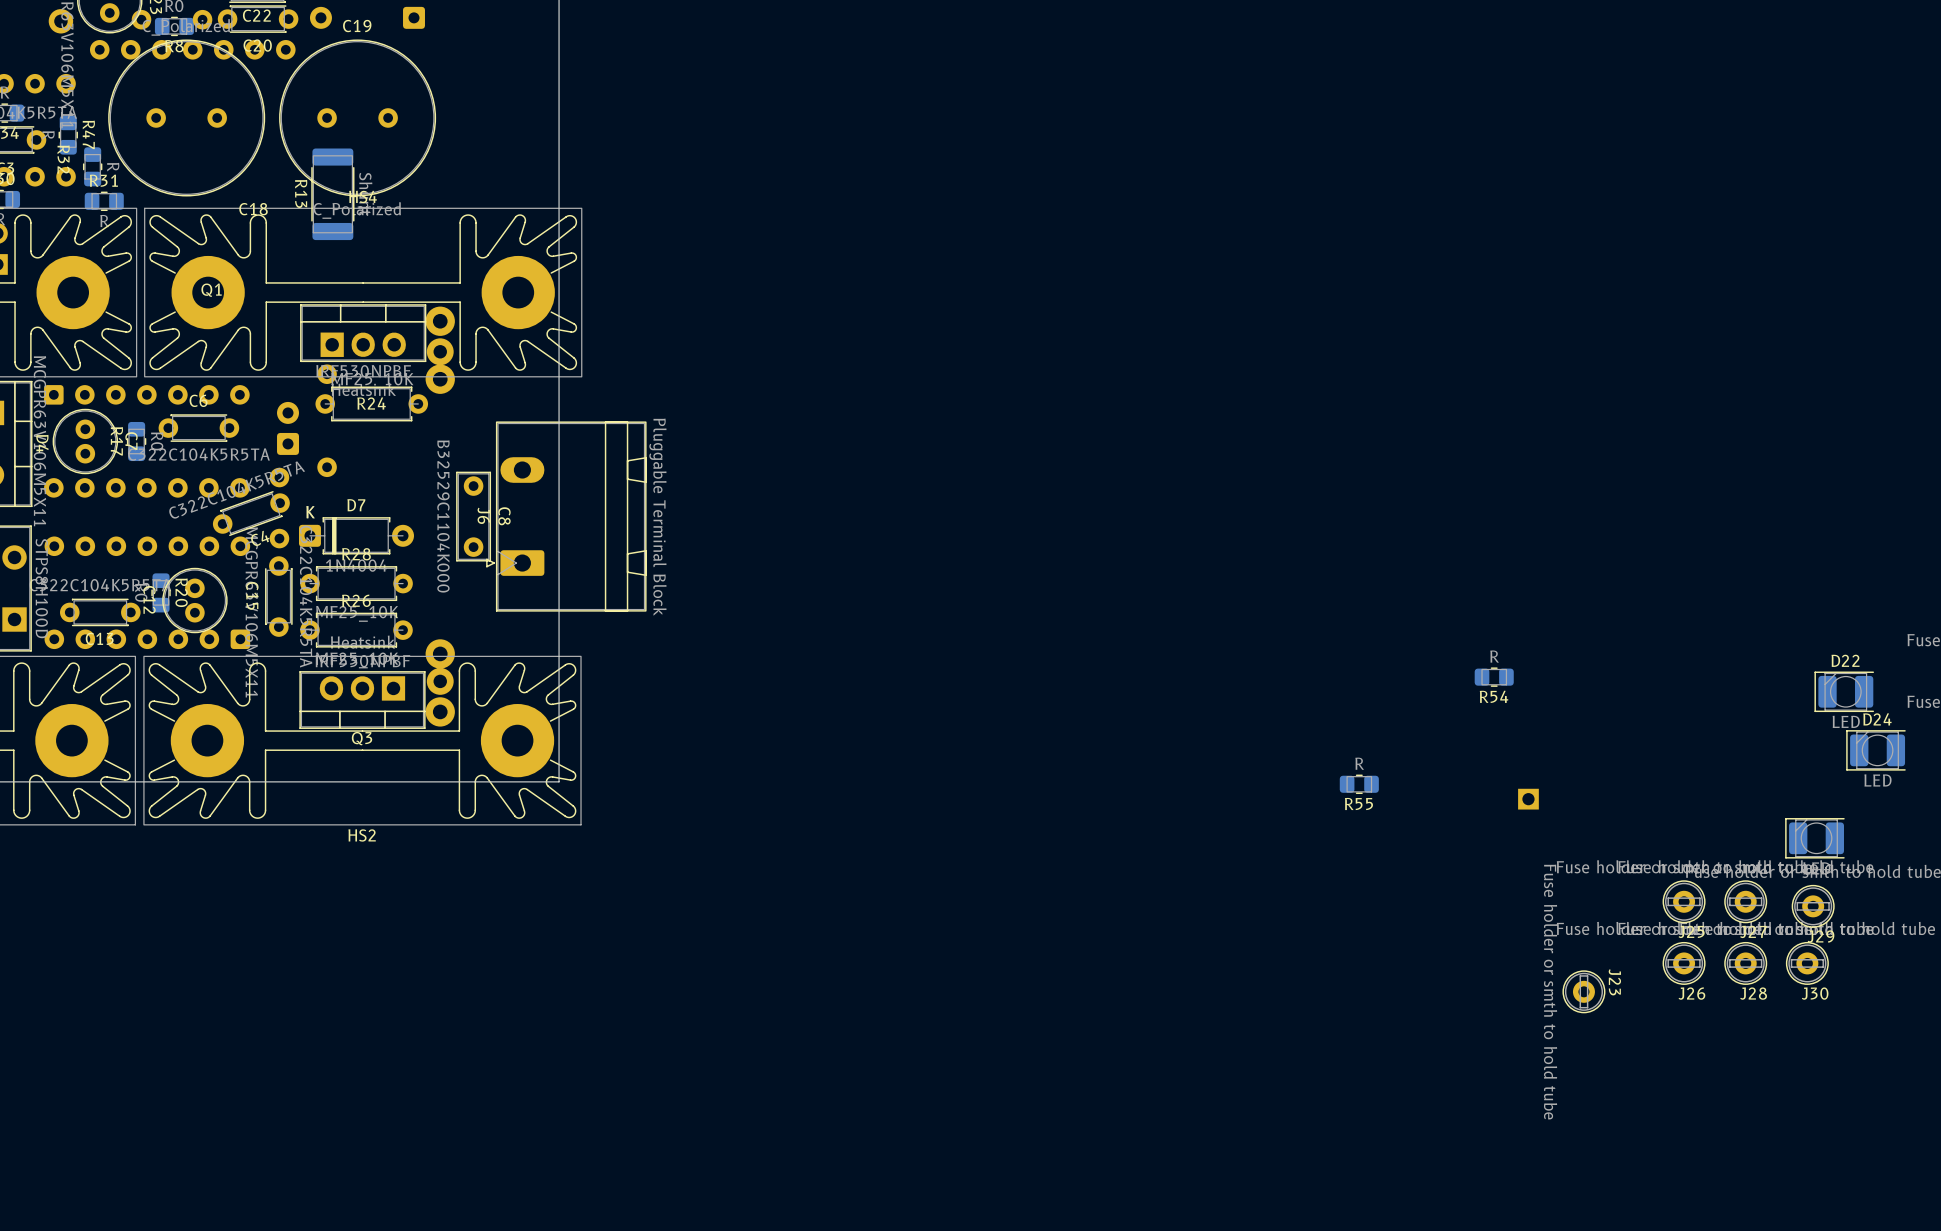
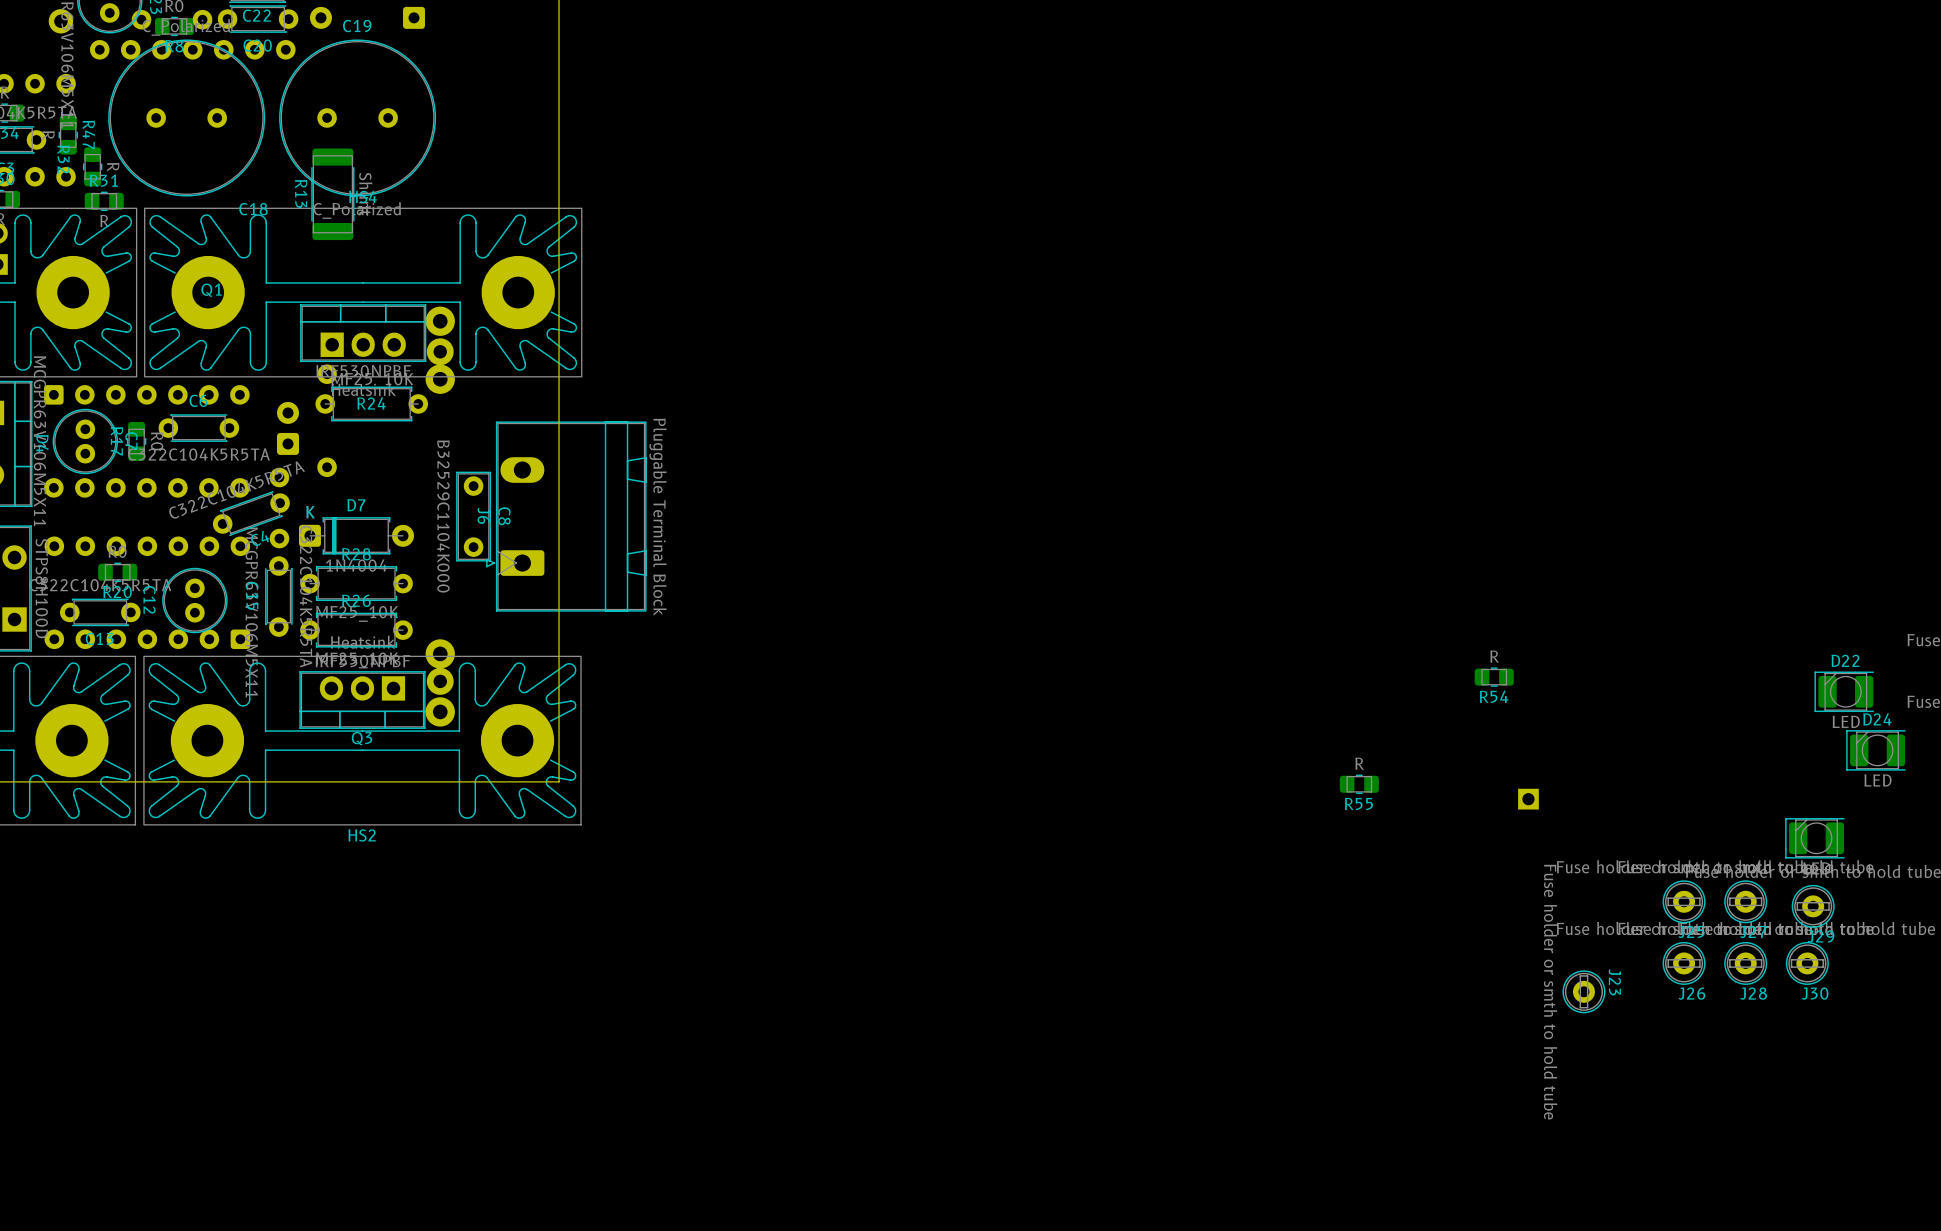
R20 rotation: 0° (161, 592) -> 90° clockwise (117, 572)
R20 position: (161, 592) -> (117, 572)

